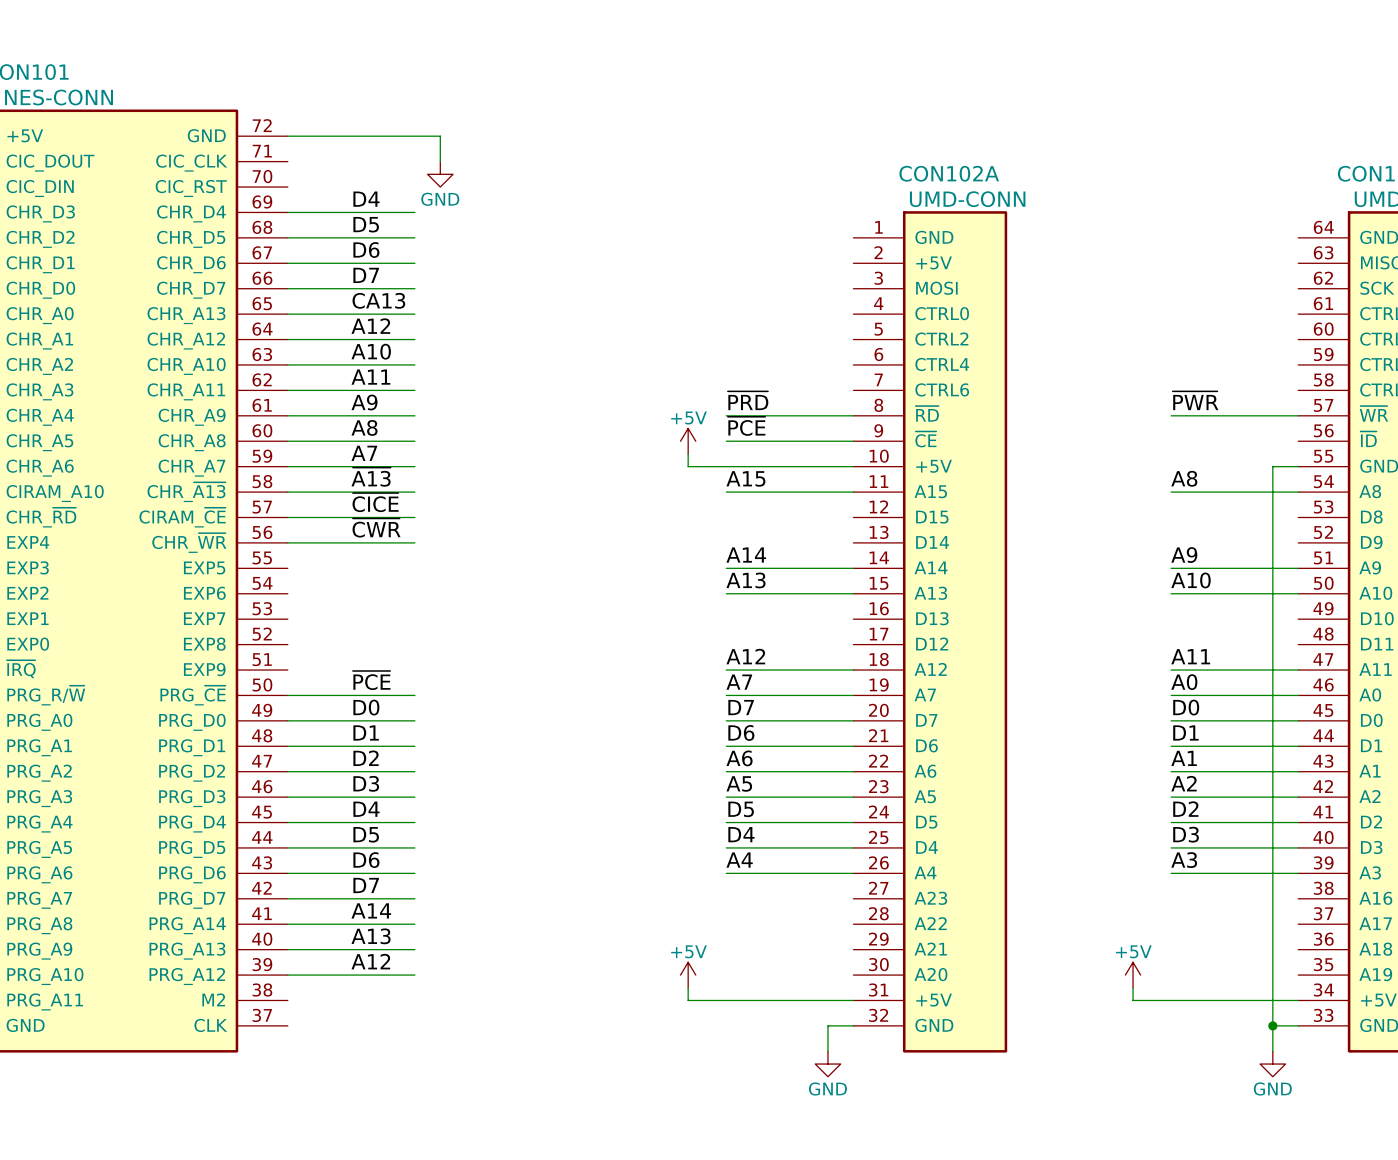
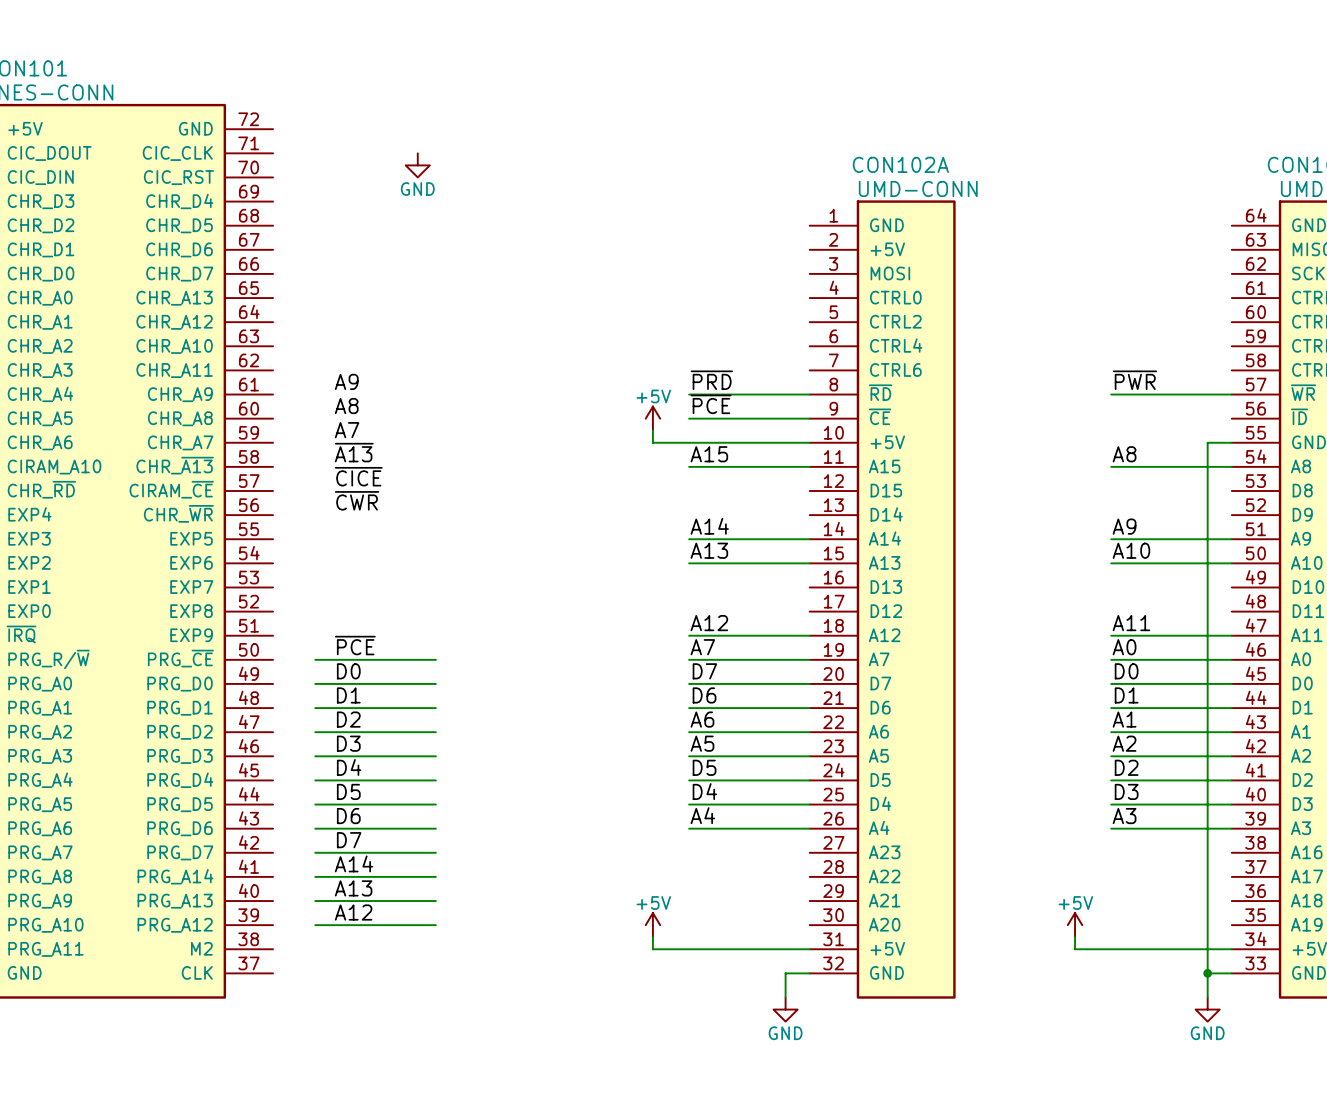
wire: (287, 136) (440, 136) (440, 161) -> none
label: D4 (366, 199) -> none
wire: (287, 212) (414, 212) -> none
label: D5 (366, 224) -> none
wire: (287, 237) (414, 237) -> none
label: D6 (366, 250) -> none
wire: (287, 263) (414, 263) -> none
label: D7 (366, 275) -> none
wire: (287, 288) (414, 288) -> none
label: CA13 (378, 300) -> none
wire: (287, 314) (414, 314) -> none
label: A12 (370, 326) -> none
wire: (287, 339) (414, 339) -> none
label: A10 (371, 351) -> none
wire: (287, 364) (414, 364) -> none
label: A11 (370, 377) -> none
wire: (287, 390) (414, 390) -> none
wire: (287, 415) (414, 415) -> none
wire: (287, 441) (414, 441) -> none
wire: (287, 466) (414, 466) -> none
wire: (287, 492) (414, 492) -> none
wire: (287, 517) (414, 517) -> none
wire: (287, 542) (414, 542) -> none
wire: (287, 695) (332, 695) -> (393, 659) (435, 659)
wire: (287, 720) (332, 720) -> (393, 683) (435, 683)
wire: (287, 746) (332, 746) -> (393, 708) (435, 708)
wire: (287, 771) (332, 771) -> (393, 732) (435, 732)
wire: (287, 797) (332, 797) -> (393, 756) (435, 756)
wire: (287, 822) (332, 822) -> (393, 780) (435, 780)
wire: (287, 847) (332, 847) -> (393, 804) (435, 804)
wire: (287, 873) (332, 873) -> (393, 828) (435, 828)
wire: (287, 898) (332, 898) -> (393, 852) (435, 852)
wire: (287, 924) (332, 924) -> (393, 876) (435, 876)
wire: (287, 949) (332, 949) -> (393, 901) (435, 901)
wire: (287, 975) (332, 975) -> (393, 925) (435, 925)

